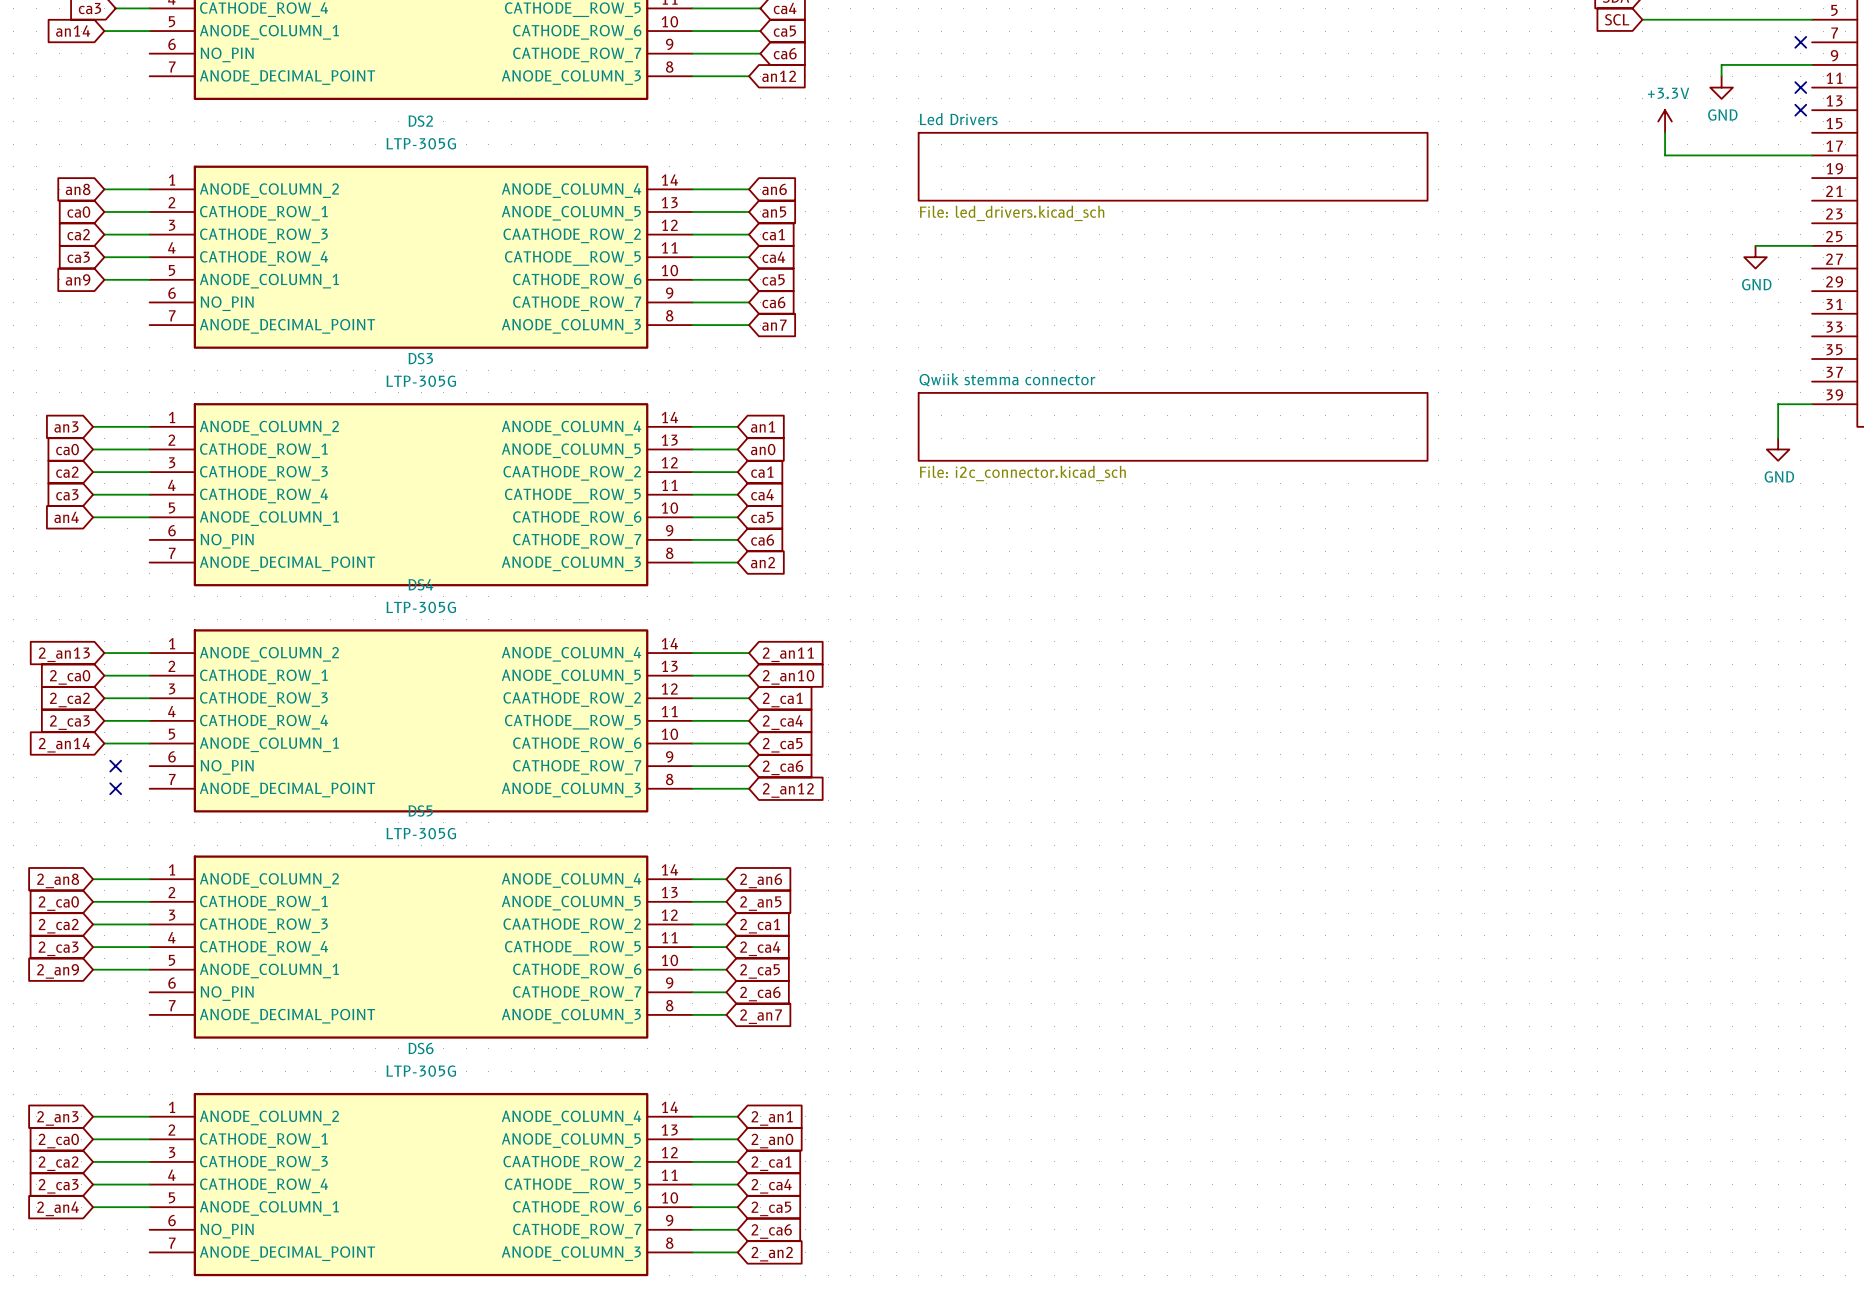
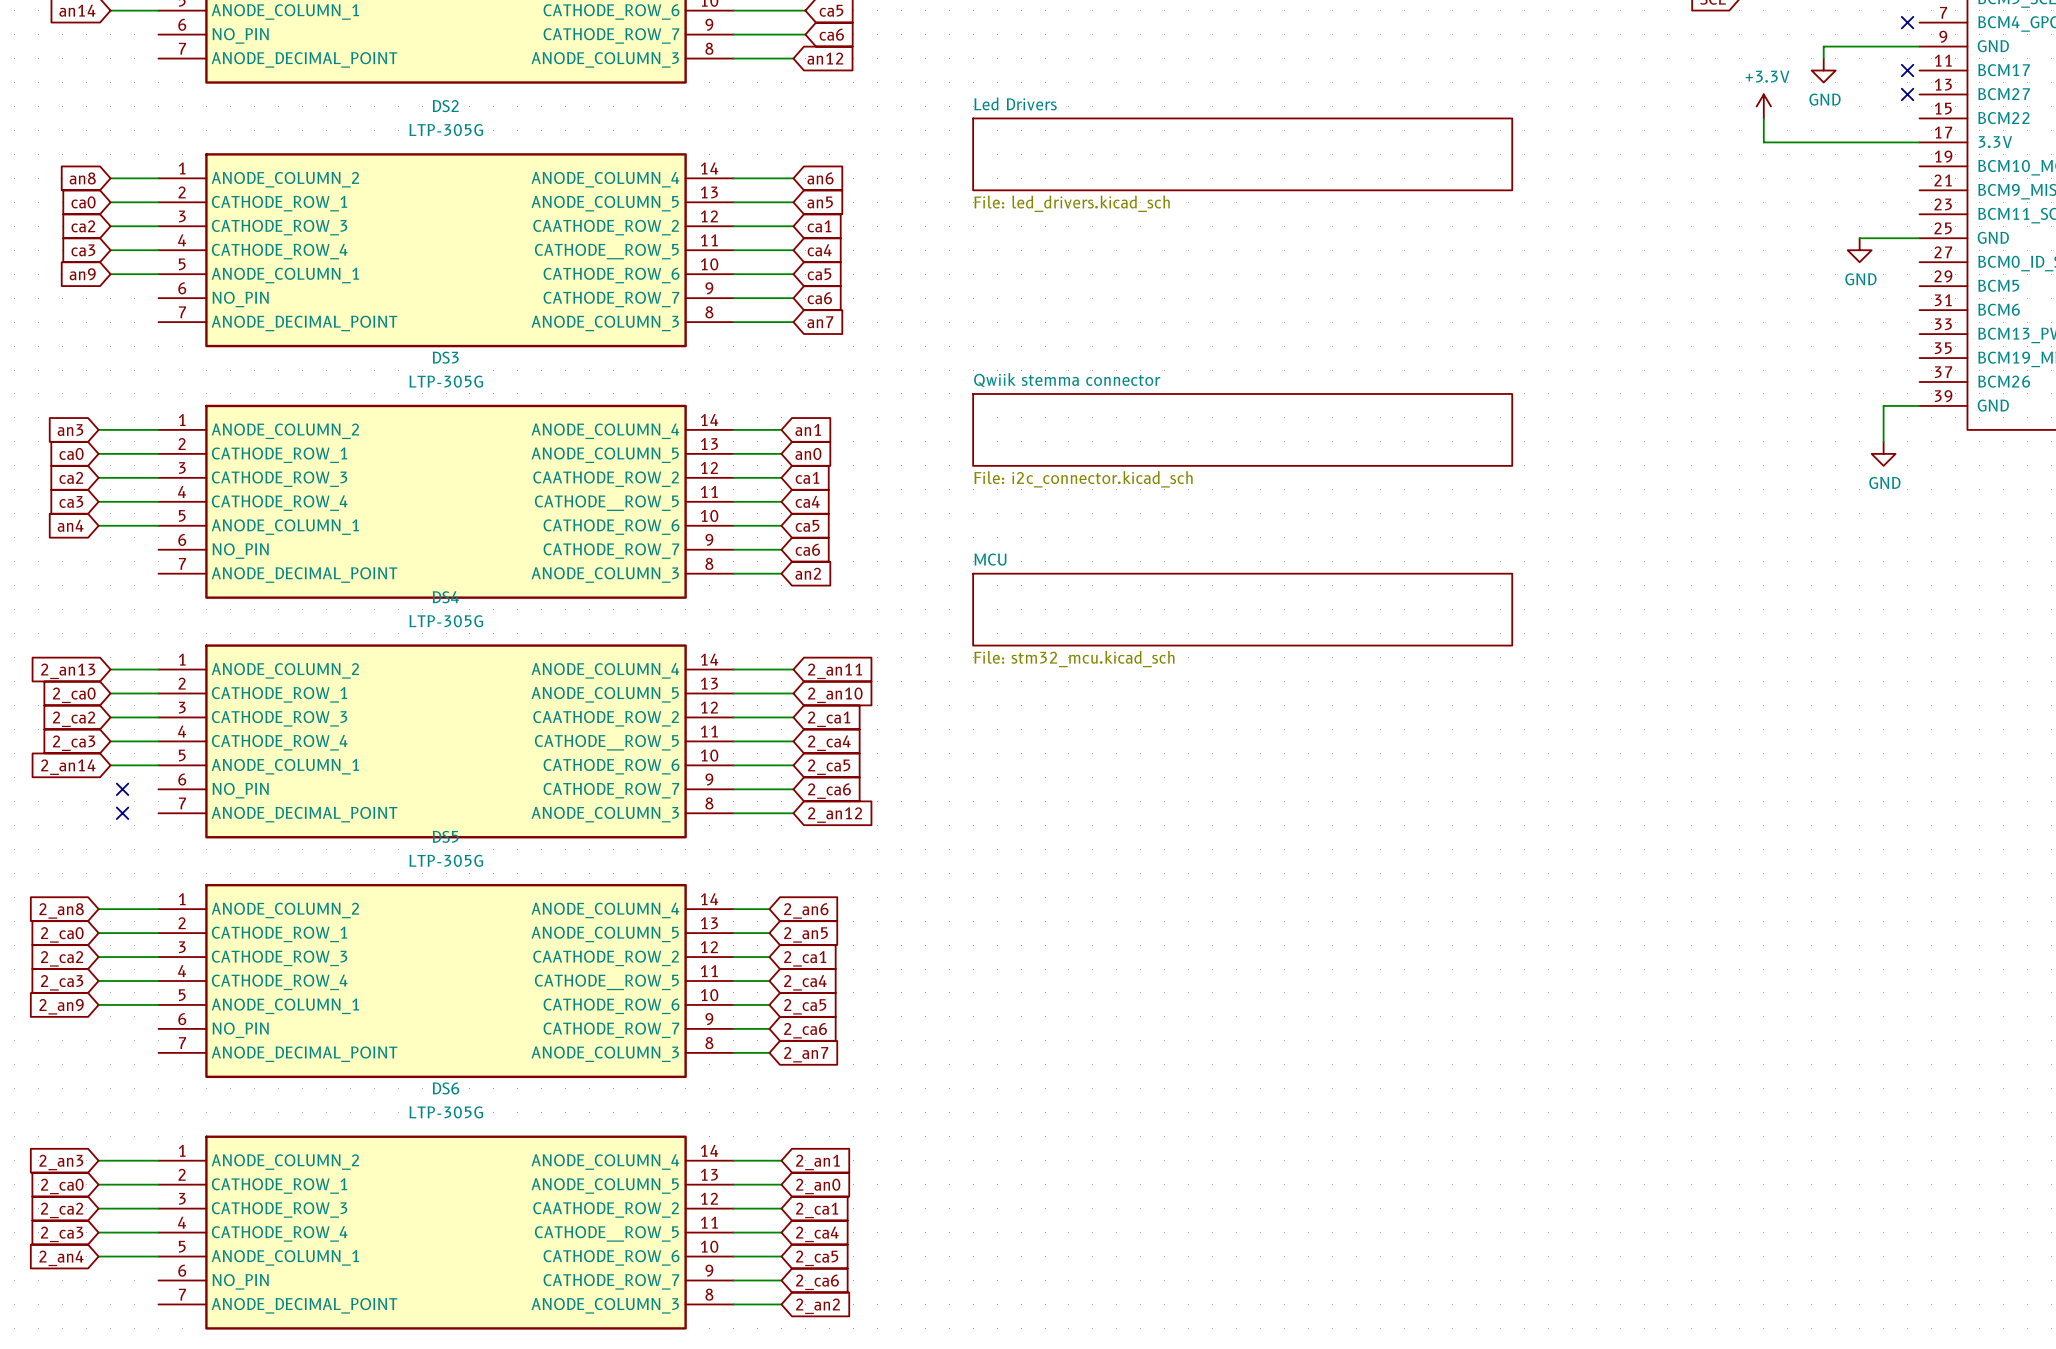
sheet MCU: none -> File: stm32_mcu.kicad_sch (1242, 609)

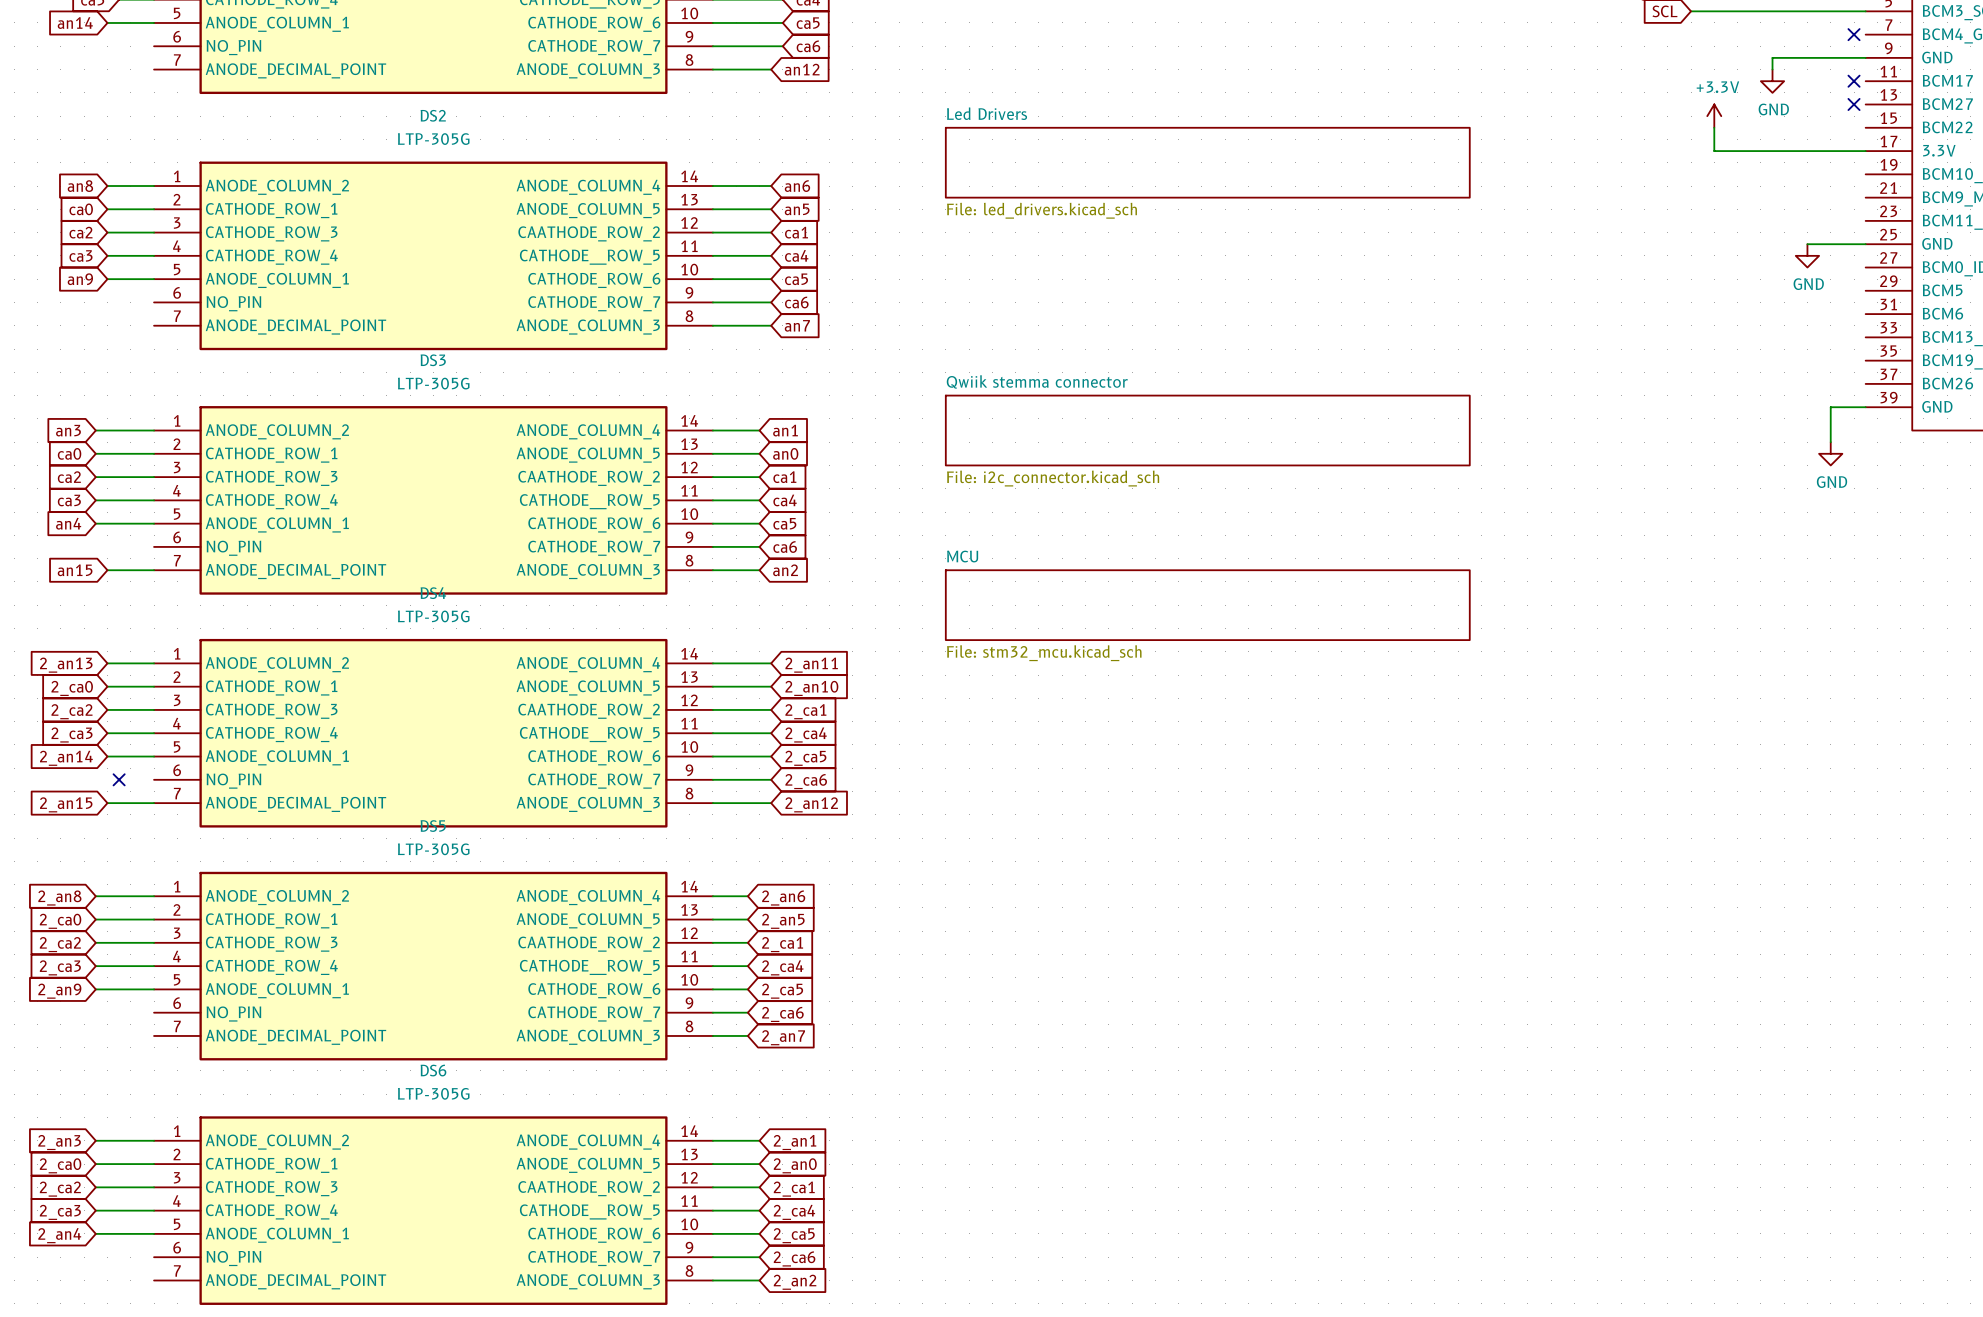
global label: none -> an15 (75, 570)
wire: none -> (107, 570) (154, 570)
wire: none -> (107, 803) (154, 803)
no-connect mark: (122, 813) -> none
global label: none -> 2_an15 (66, 804)

